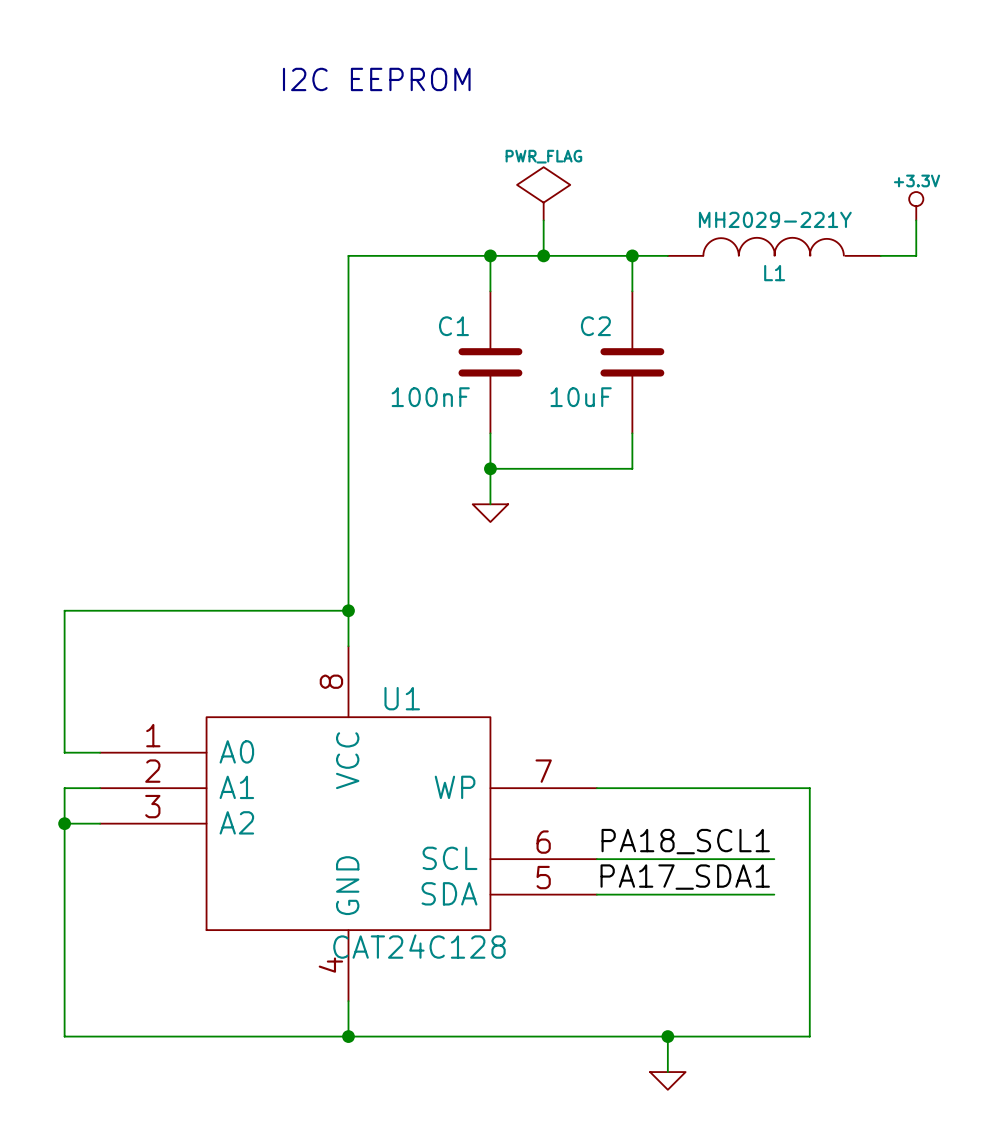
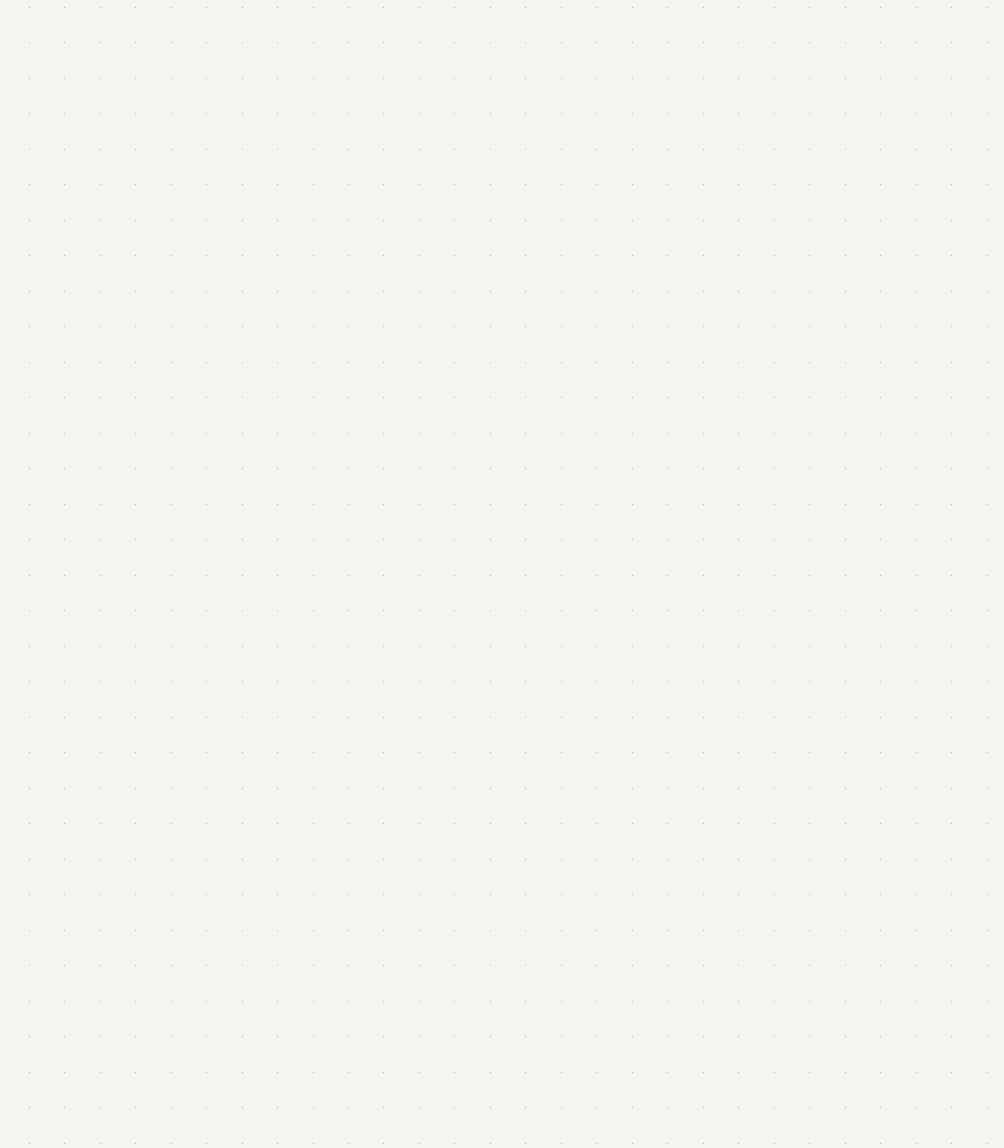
text: I2C EEPROM (376, 79) -> none
power symbol: PWR_FLAG (543, 193) -> none
power symbol: +3.3V (916, 206) -> none
wire: (543, 220) (543, 255) -> none
wire: (916, 220) (916, 255) (880, 255) -> none
L1: MH2029-221Y (774, 246) -> none
wire: (490, 255) (490, 291) -> none
junction: (490, 255) -> none
junction: (543, 255) -> none
wire: (632, 255) (632, 291) -> none
junction: (632, 255) -> none
wire: (667, 255) (348, 255) (348, 646) -> none
C1: 100nF (490, 362) -> none
C2: 10uF (632, 362) -> none
wire: (490, 433) (490, 504) -> none
wire: (632, 433) (632, 468) (490, 468) -> none
junction: (490, 468) -> none
power symbol: (490, 513) -> none
wire: (348, 610) (64, 610) (64, 752) (100, 752) -> none
junction: (348, 610) -> none
wire: (100, 788) (64, 788) (64, 1036) (809, 1036) (809, 788) (596, 788) -> none
wire: (64, 823) (100, 823) -> none
junction: (64, 823) -> none
U1: CAT24C128 (348, 823) -> none
label: PA18_SCL1 (685, 841) -> none
wire: (596, 859) (774, 859) -> none
label: PA17_SDA1 (685, 877) -> none
wire: (596, 894) (774, 894) -> none
wire: (348, 1001) (348, 1036) -> none
junction: (348, 1036) -> none
wire: (667, 1036) (667, 1072) -> none
junction: (667, 1036) -> none
power symbol: (667, 1080) -> none

